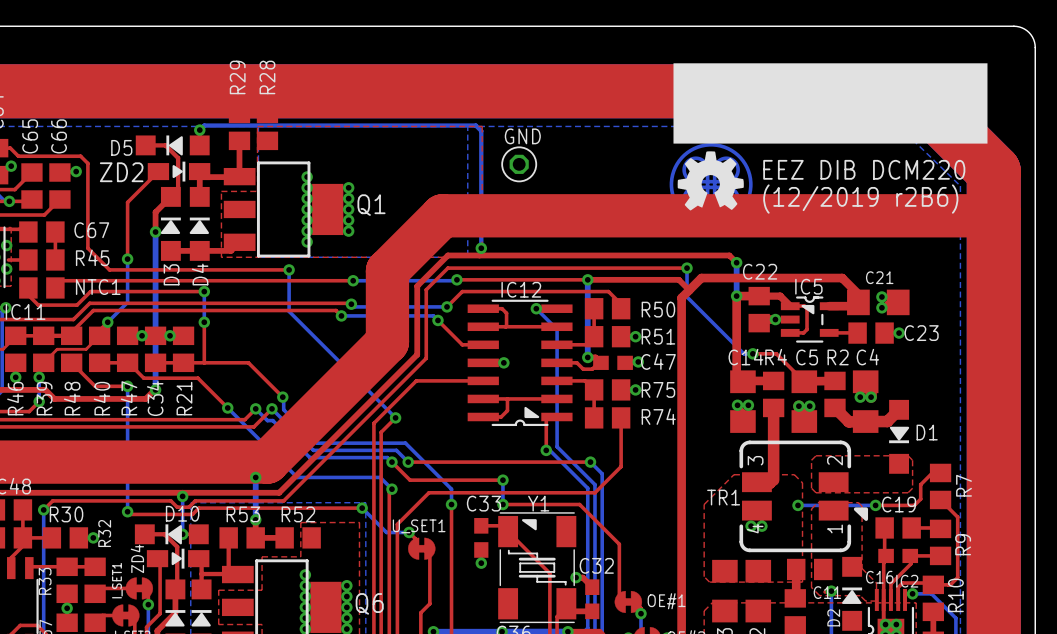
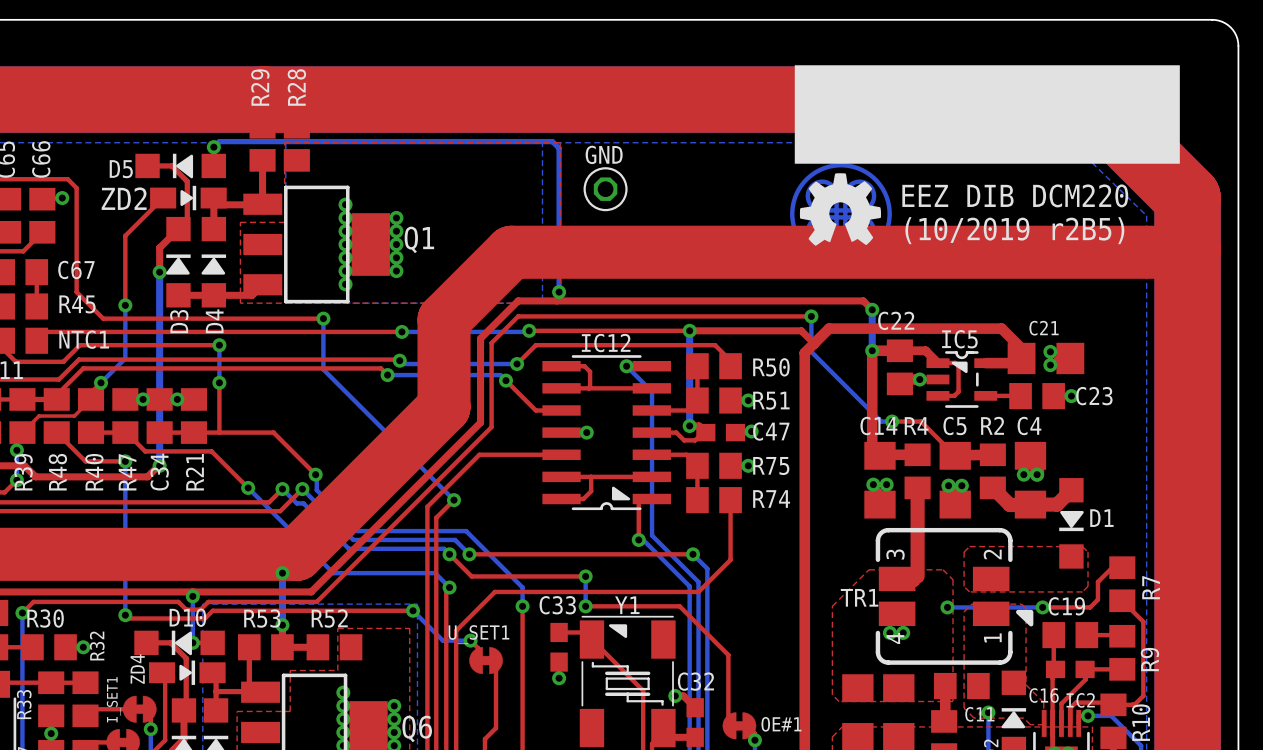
text: (12/2019 r2B6) (860, 199) -> (10/2019 r2B5) (1014, 230)

